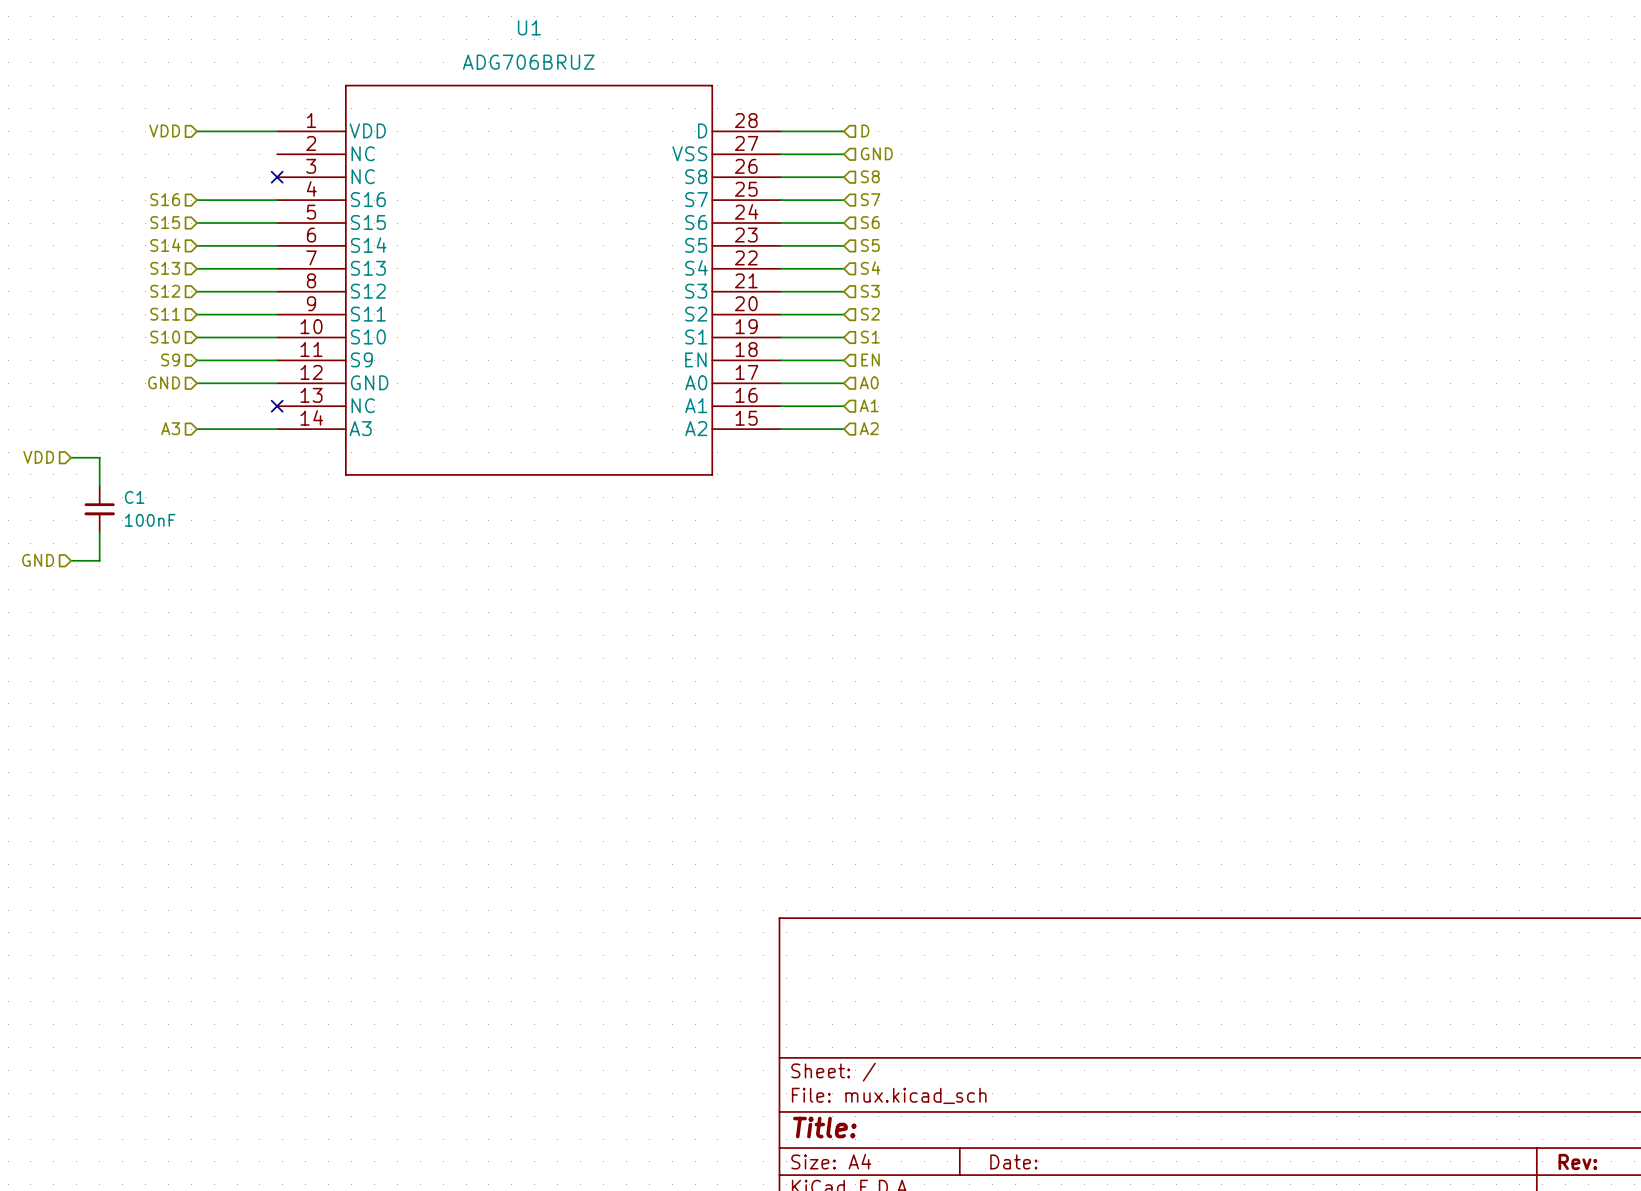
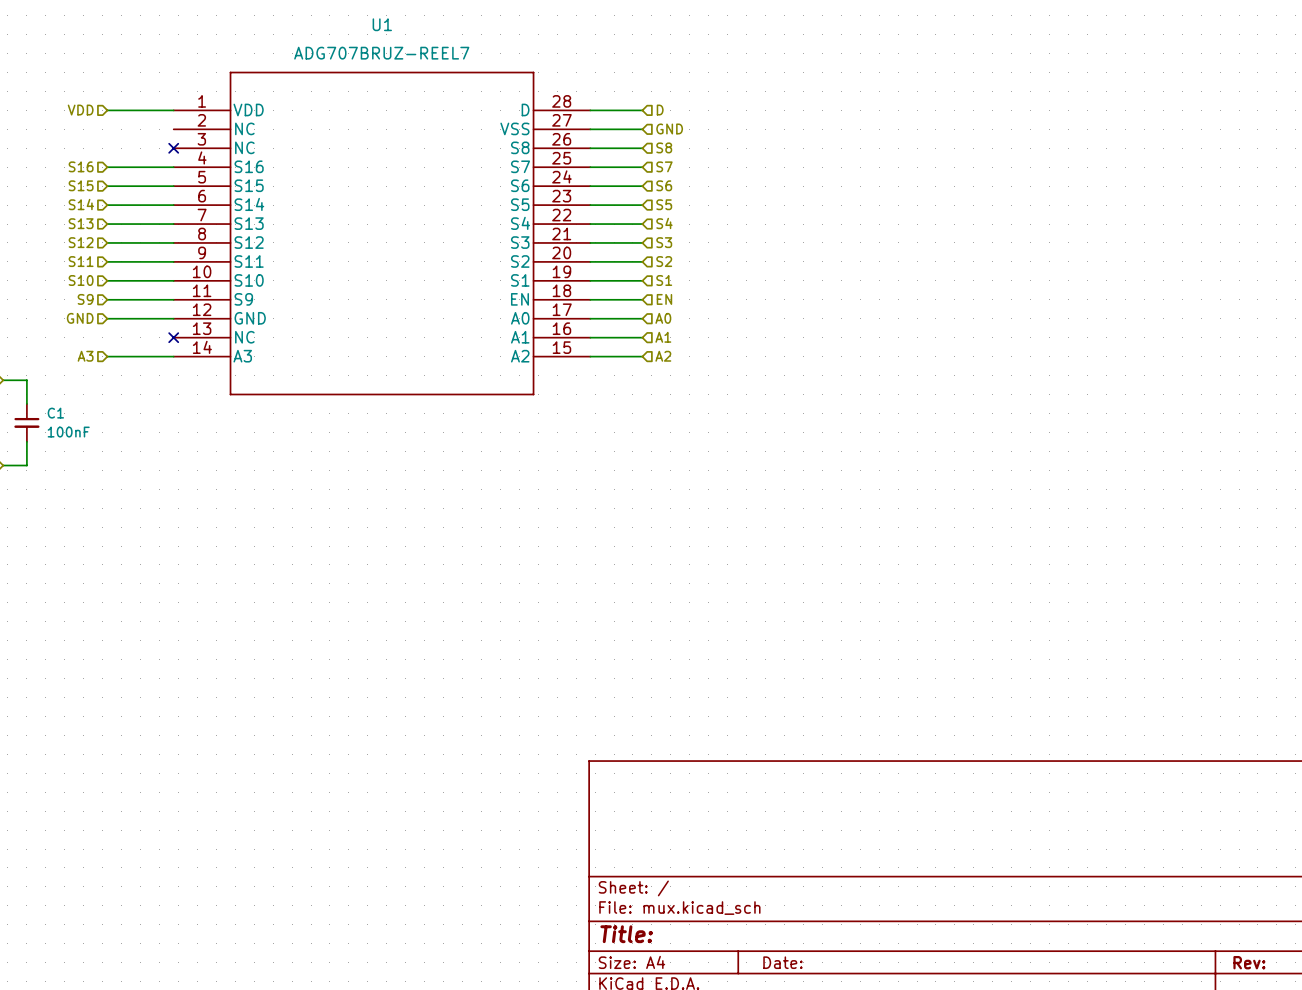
U1 value: ADG706BRUZ (528, 62) -> ADG707BRUZ-REEL7 (381, 53)

